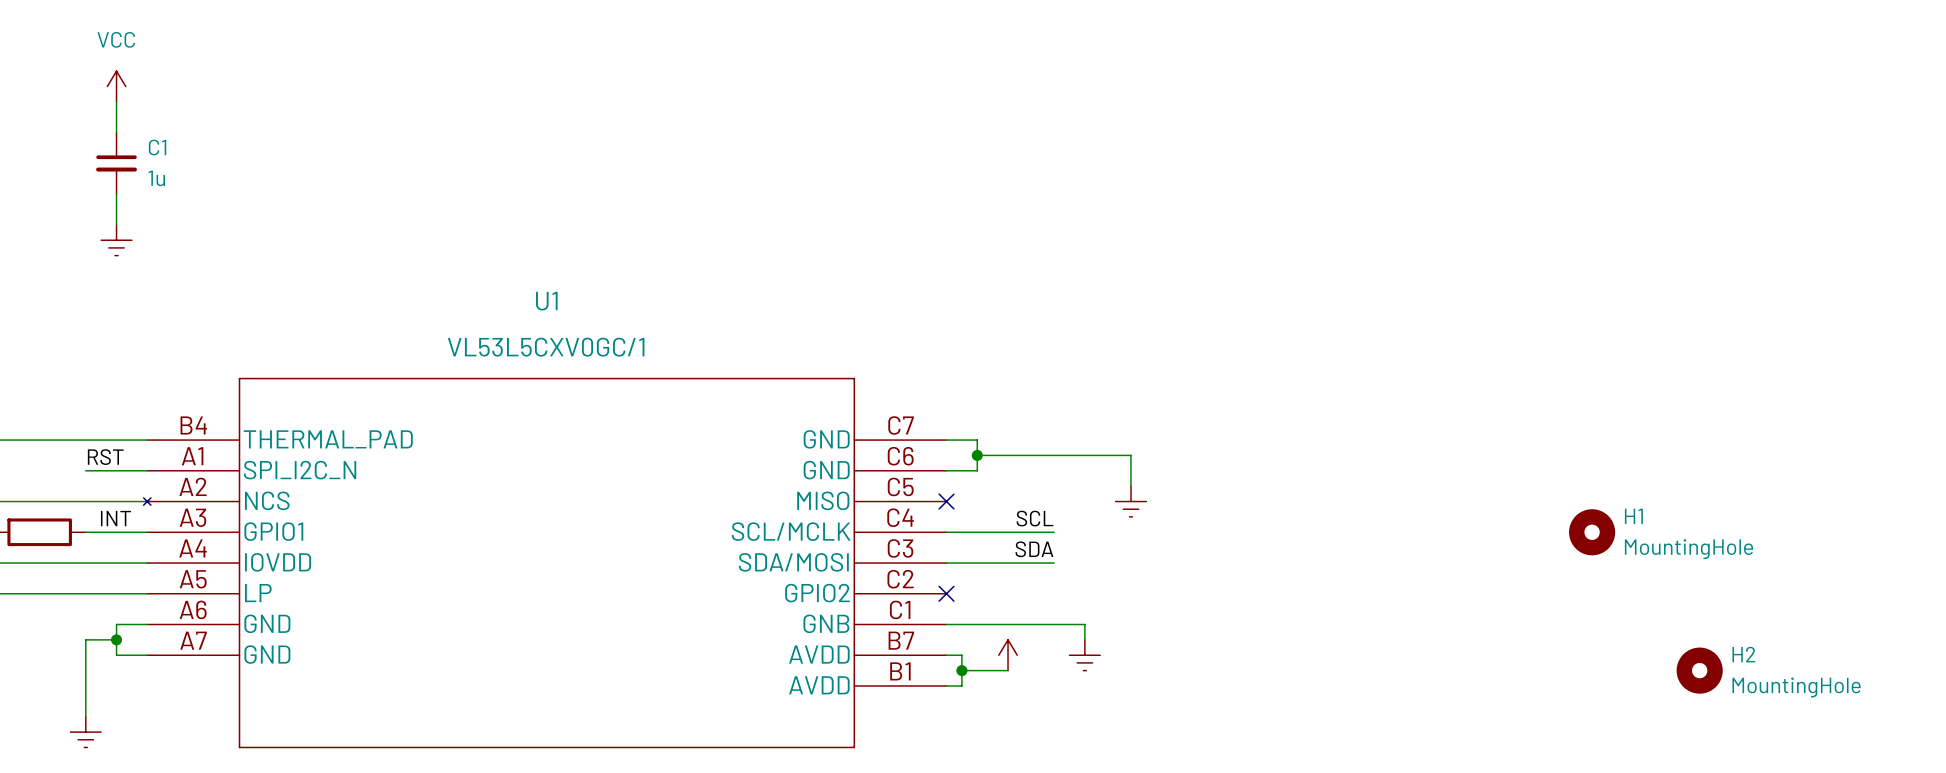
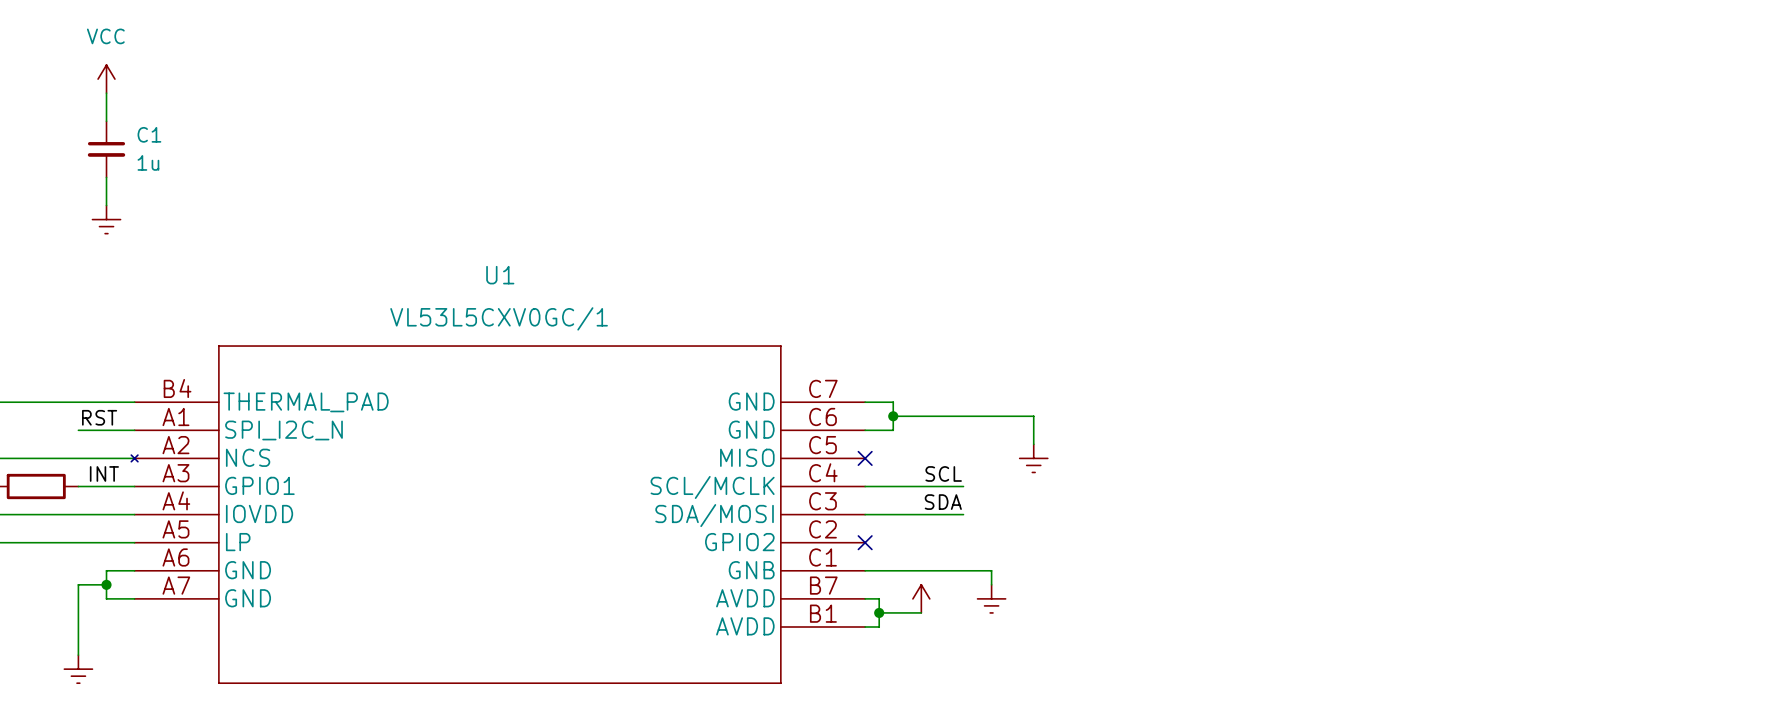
H1: MountingHole (1592, 532) -> none
H2: MountingHole (1699, 670) -> none

